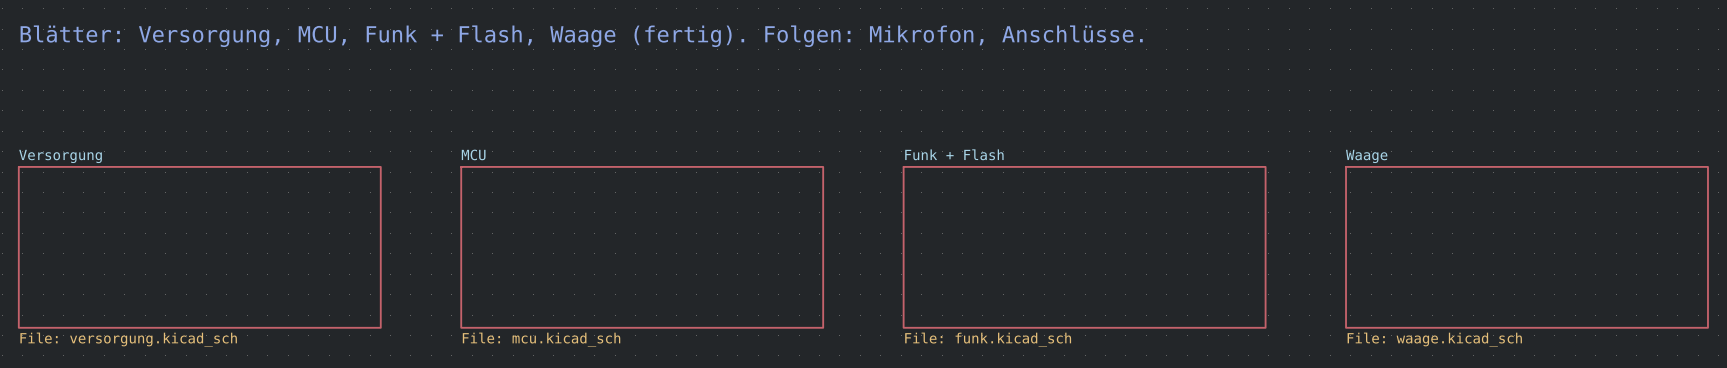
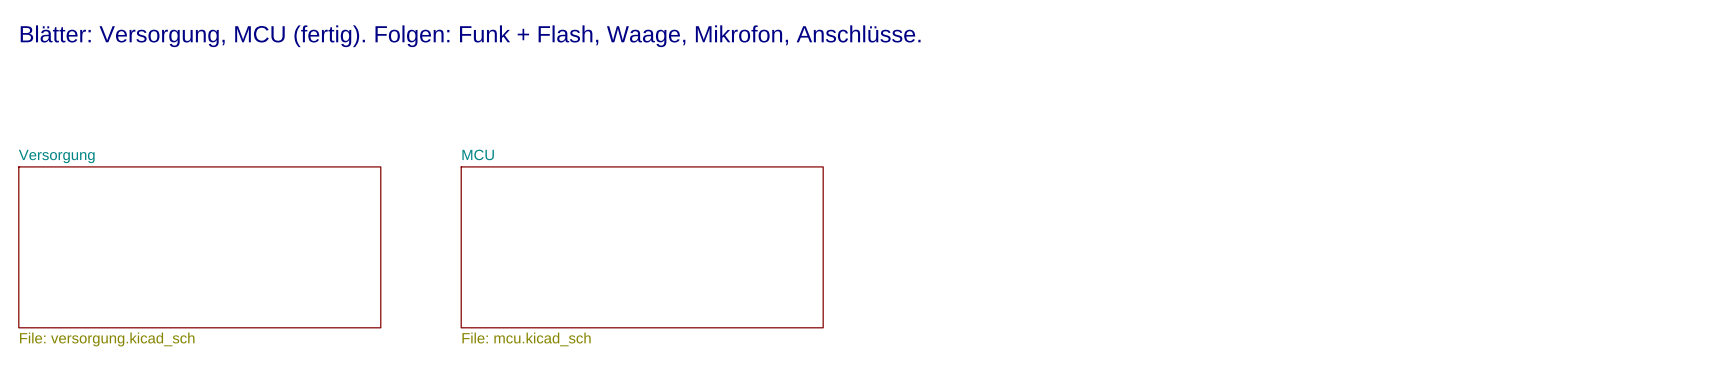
text: Blätter: Versorgung, MCU, Funk + Flash, Waage (fertig). Folgen: Mikrofon, Anschlüsse. (581, 36) -> Blätter: Versorgung, MCU (fertig). Folgen: Funk + Flash, Waage, Mikrofon, Anschlüsse. (470, 36)
sheet Funk + Flash: File: funk.kicad_sch (1084, 247) -> none
sheet Waage: File: waage.kicad_sch (1527, 247) -> none

